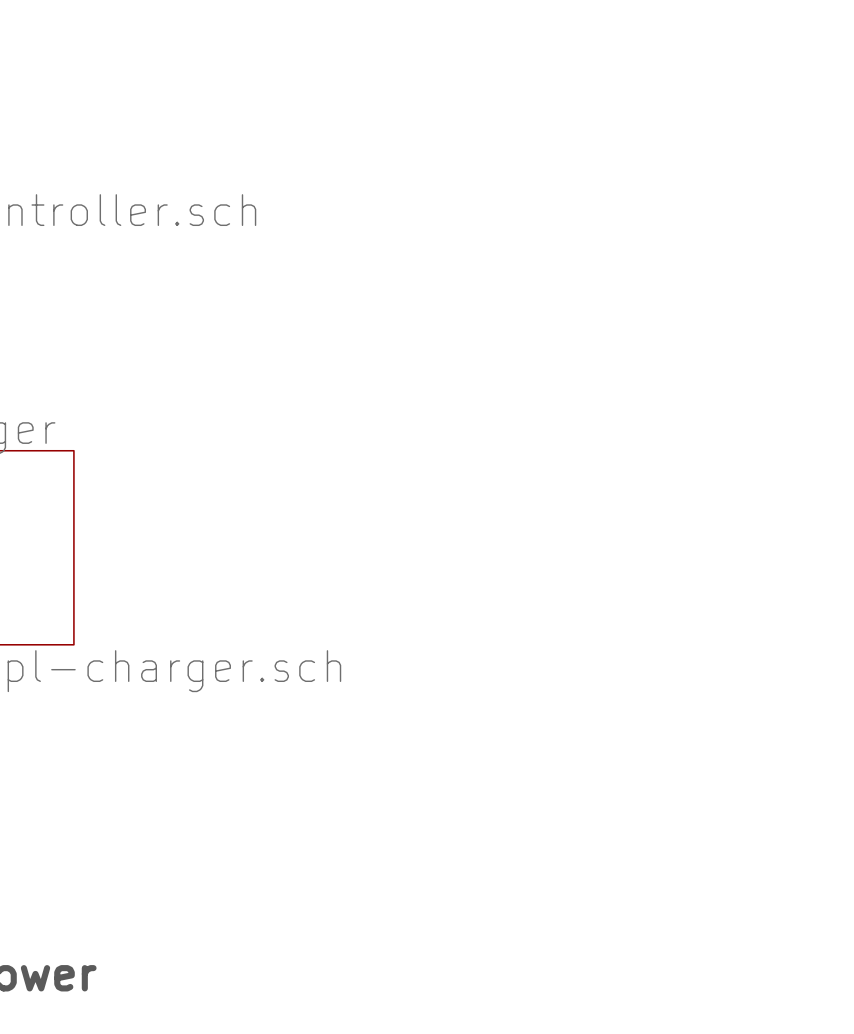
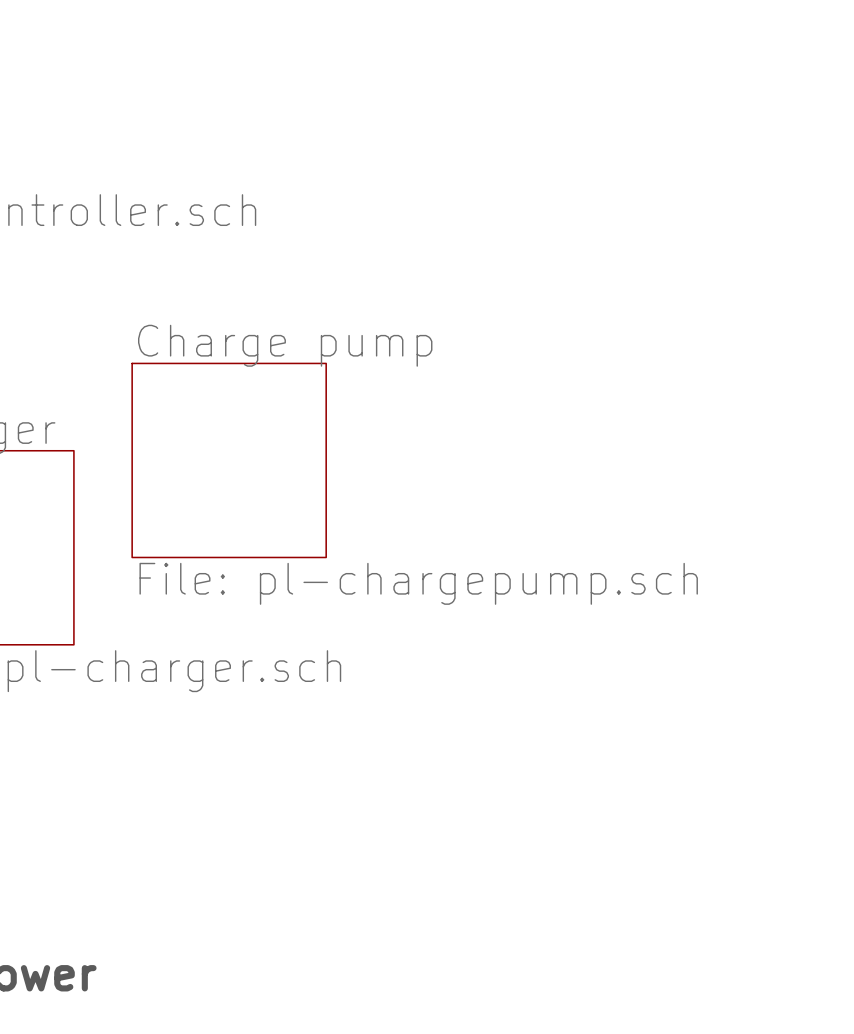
sheet Charge pump: none -> File: pl-chargepump.sch (229, 460)

